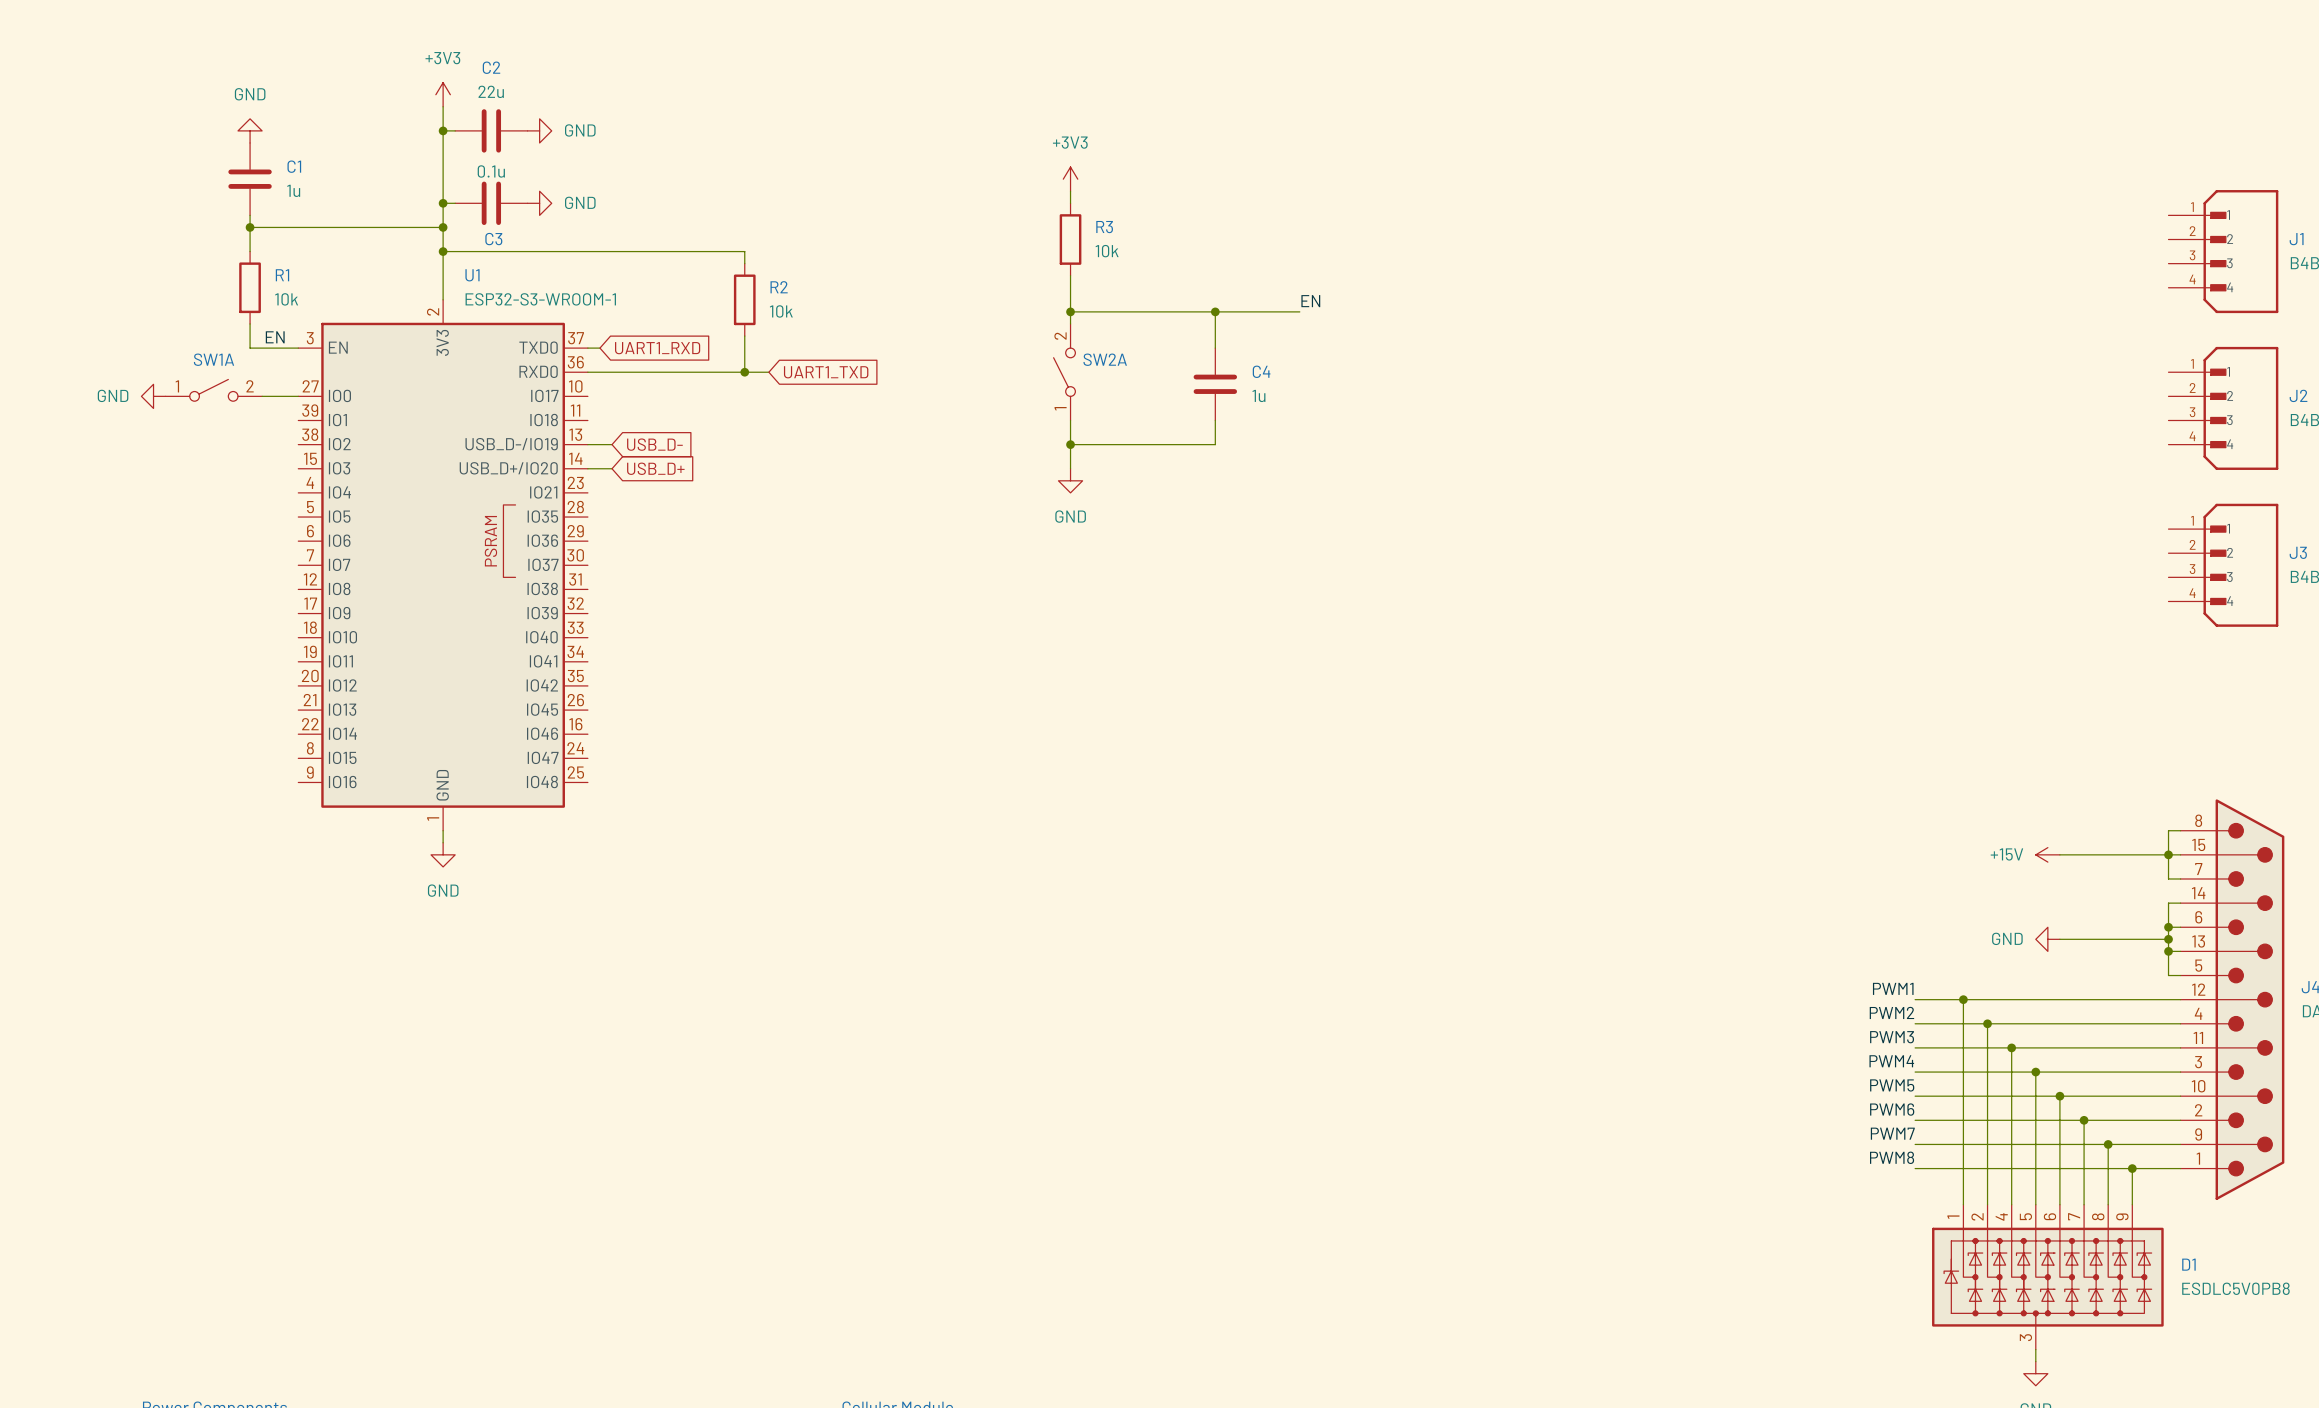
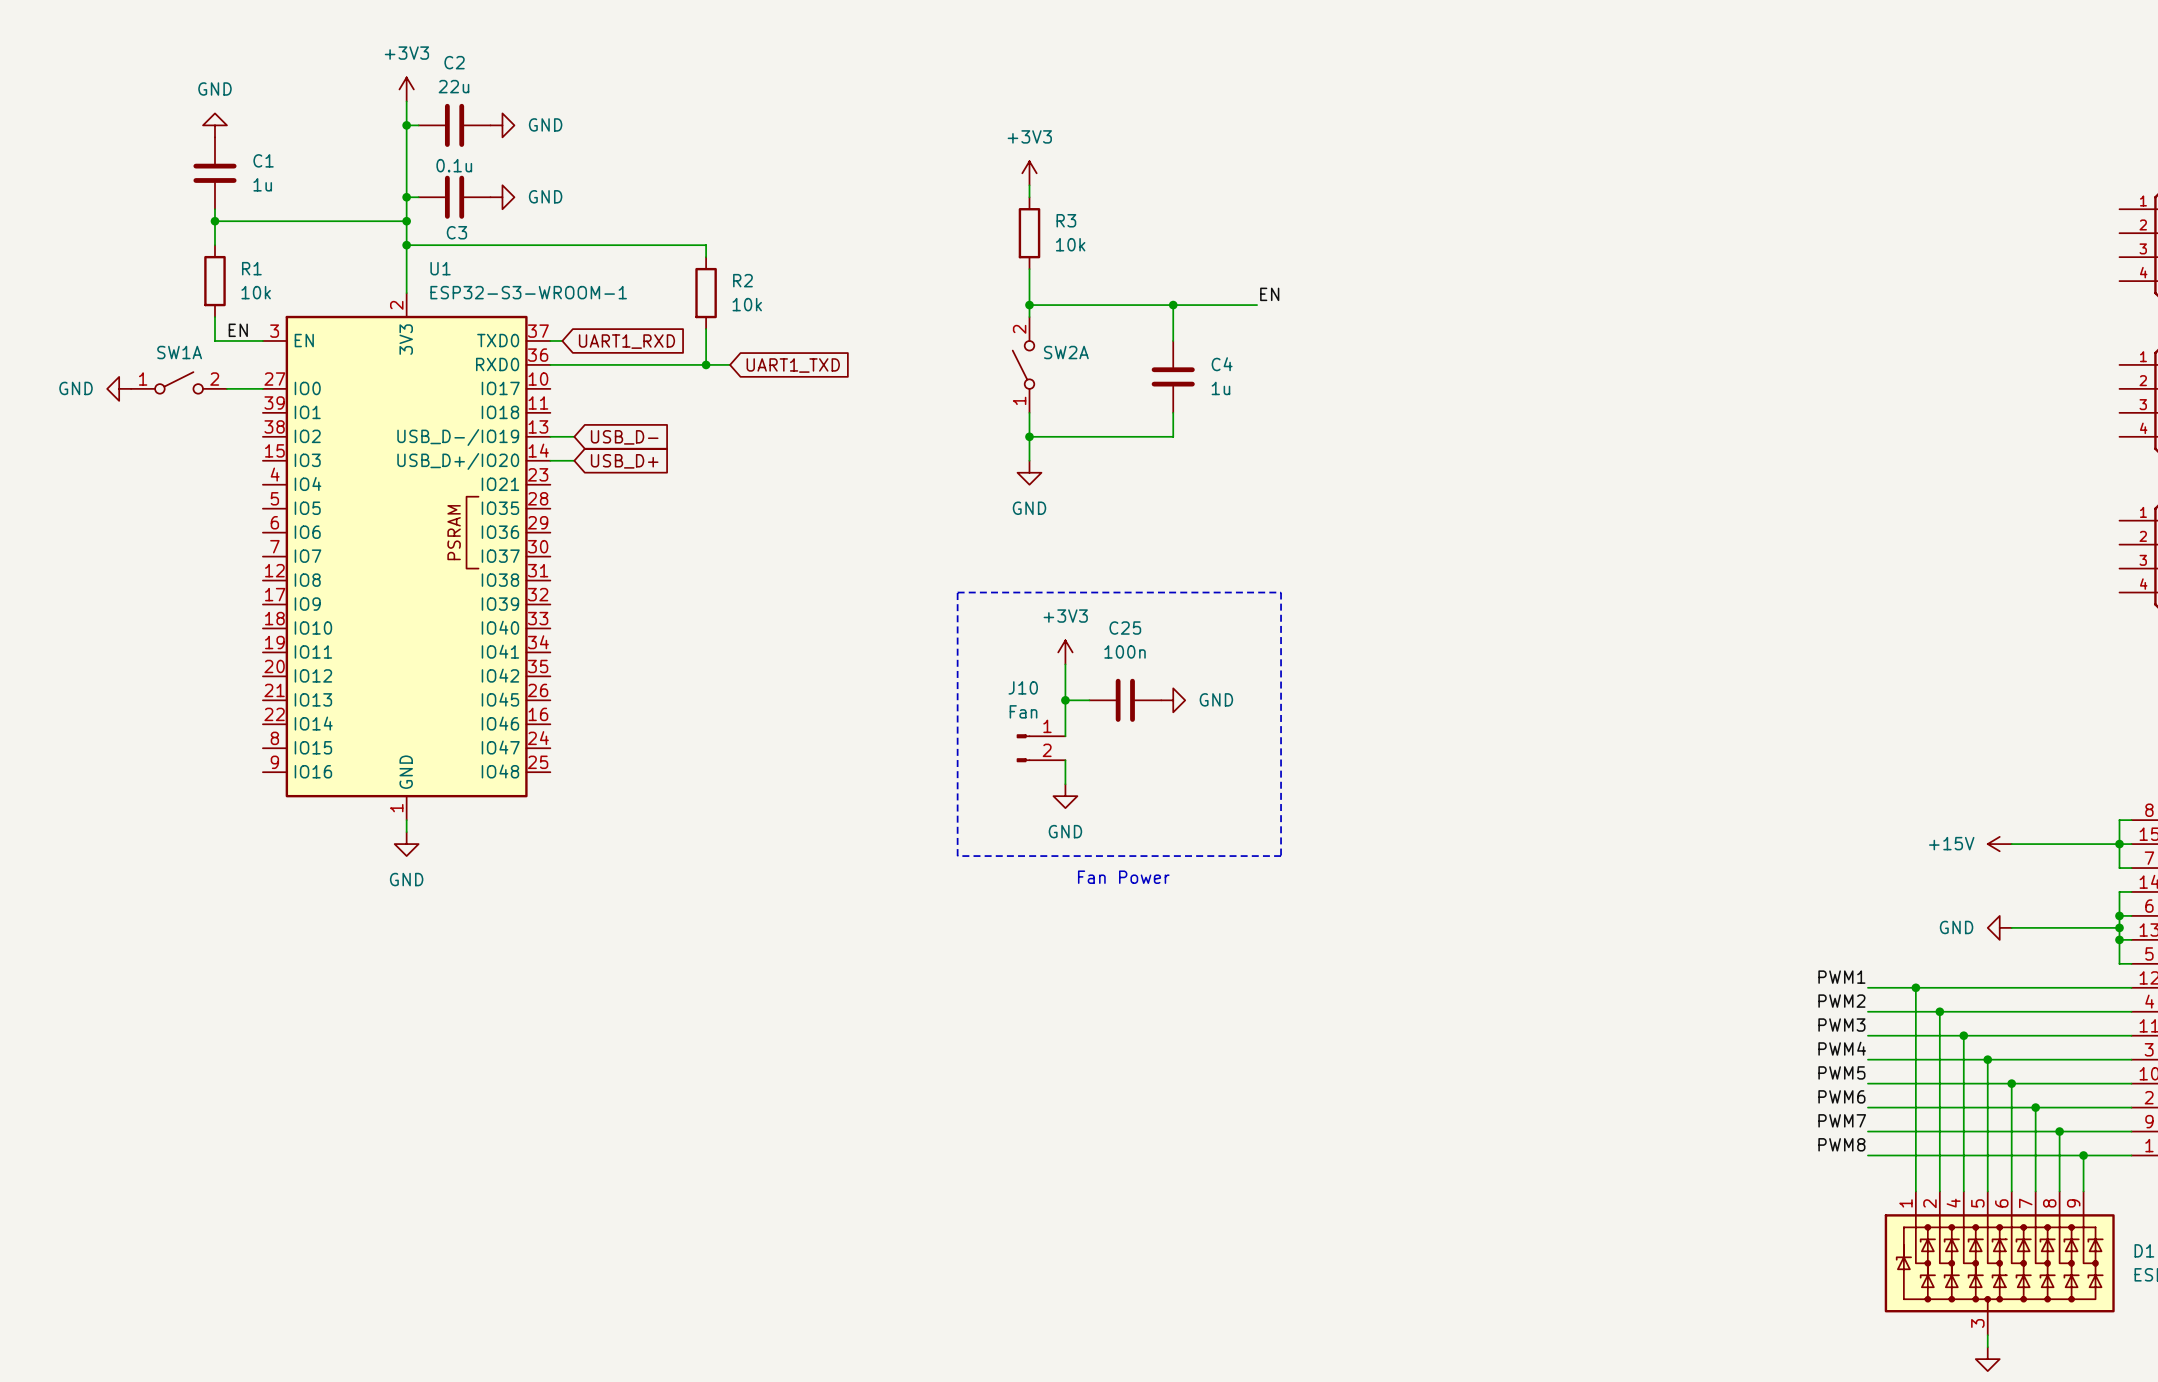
line: none -> (957, 592) (1281, 592) (1281, 856) (957, 856) (957, 592)
power symbol: none -> +3V3 (1065, 652)
wire: none -> (1065, 664) (1065, 736)
wire: none -> (1065, 700) (1089, 700)
junction: none -> (1065, 700)
C25: none -> 100n (1125, 700)
power symbol: none -> GND (1173, 700)
J10: none -> Fan (1041, 748)
wire: none -> (1065, 760) (1065, 784)
power symbol: none -> GND (1065, 796)
text: none -> Fan Power (1123, 877)

